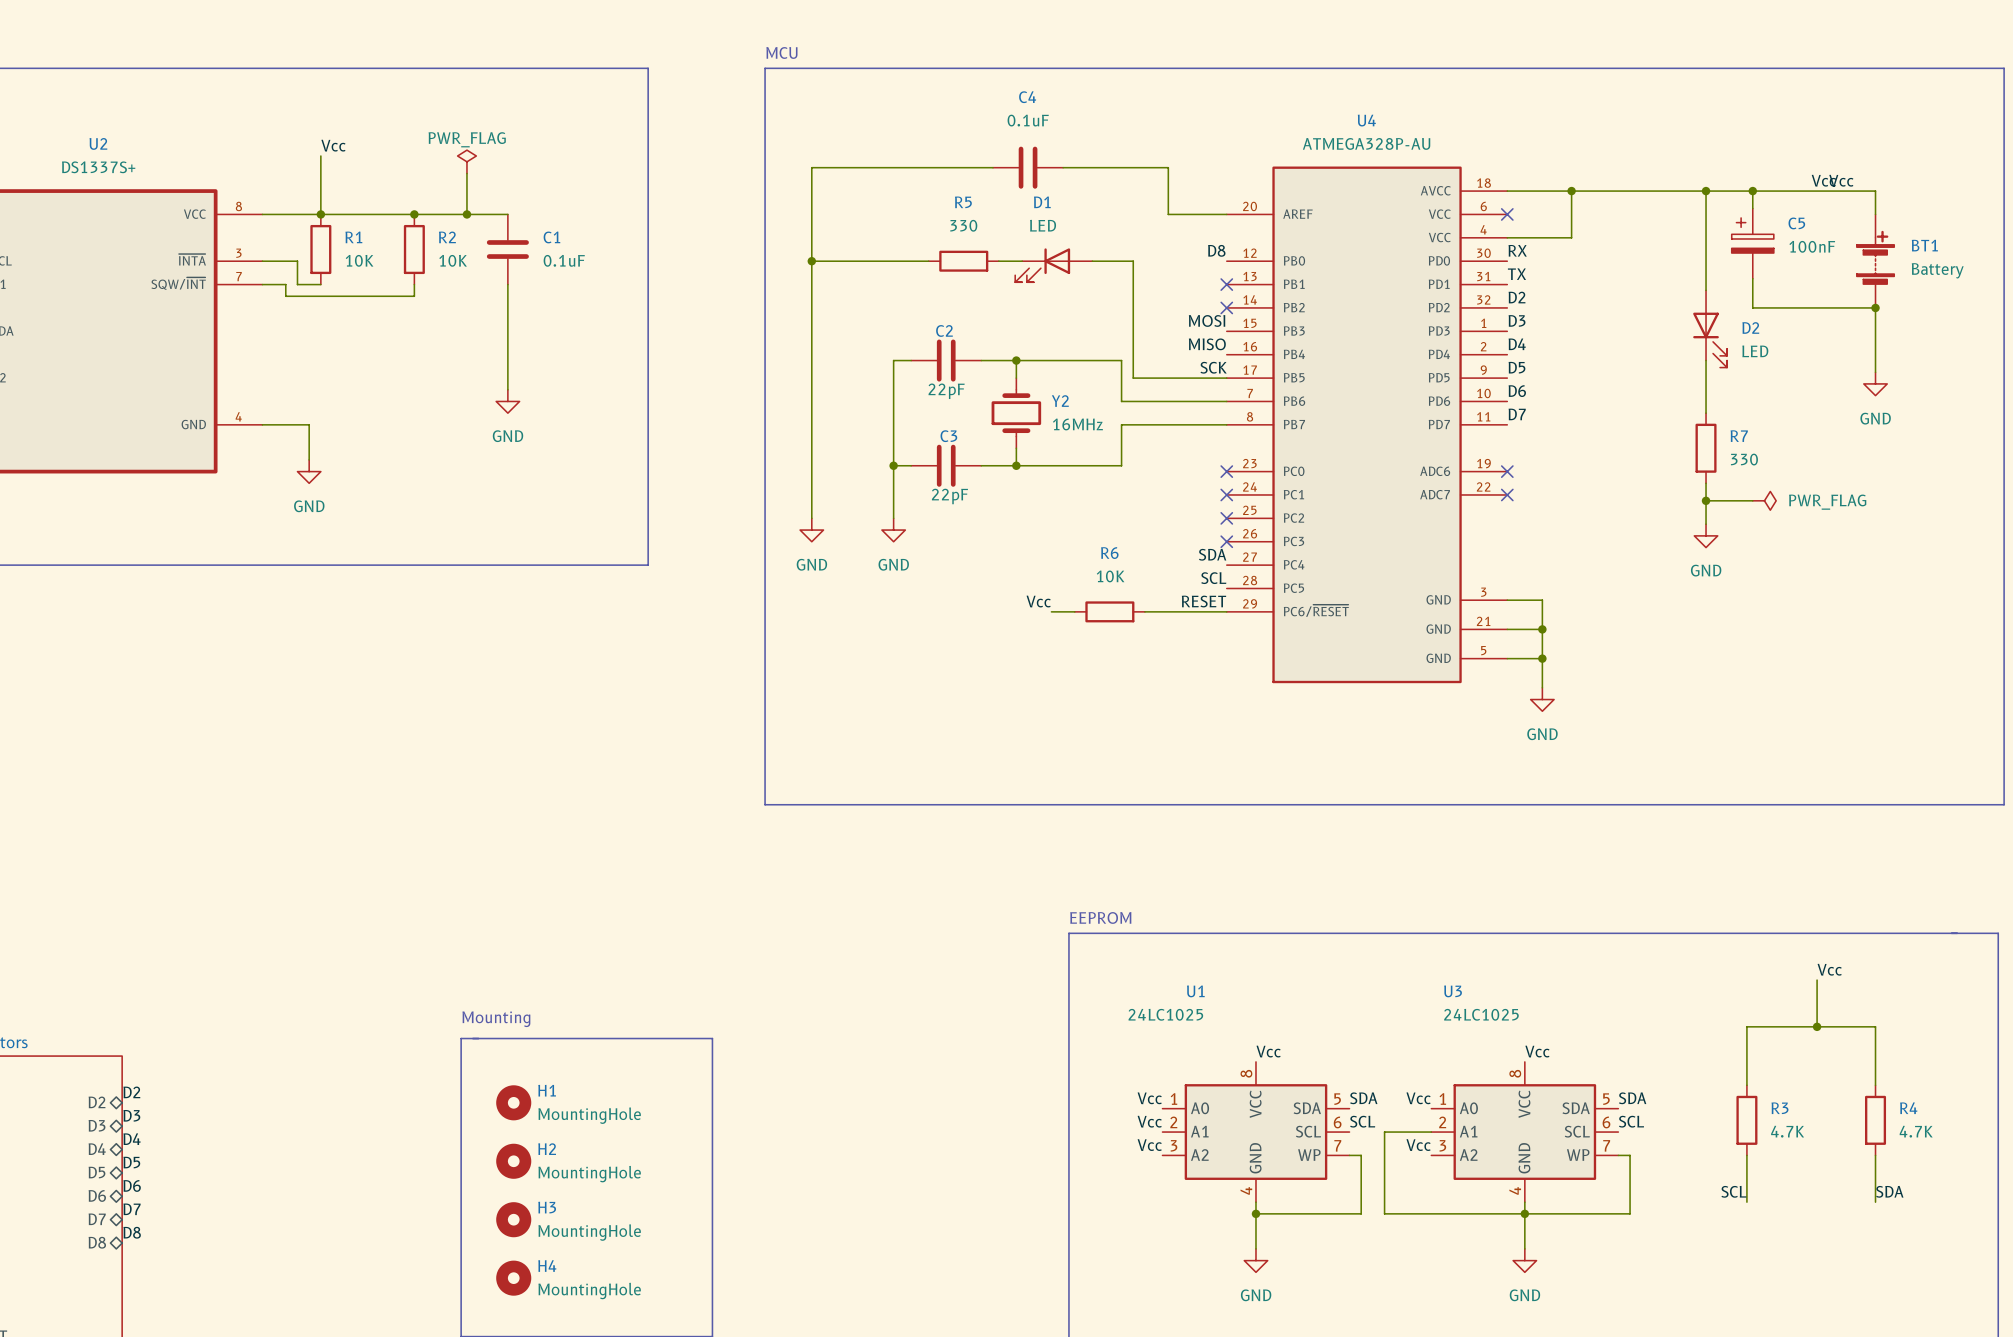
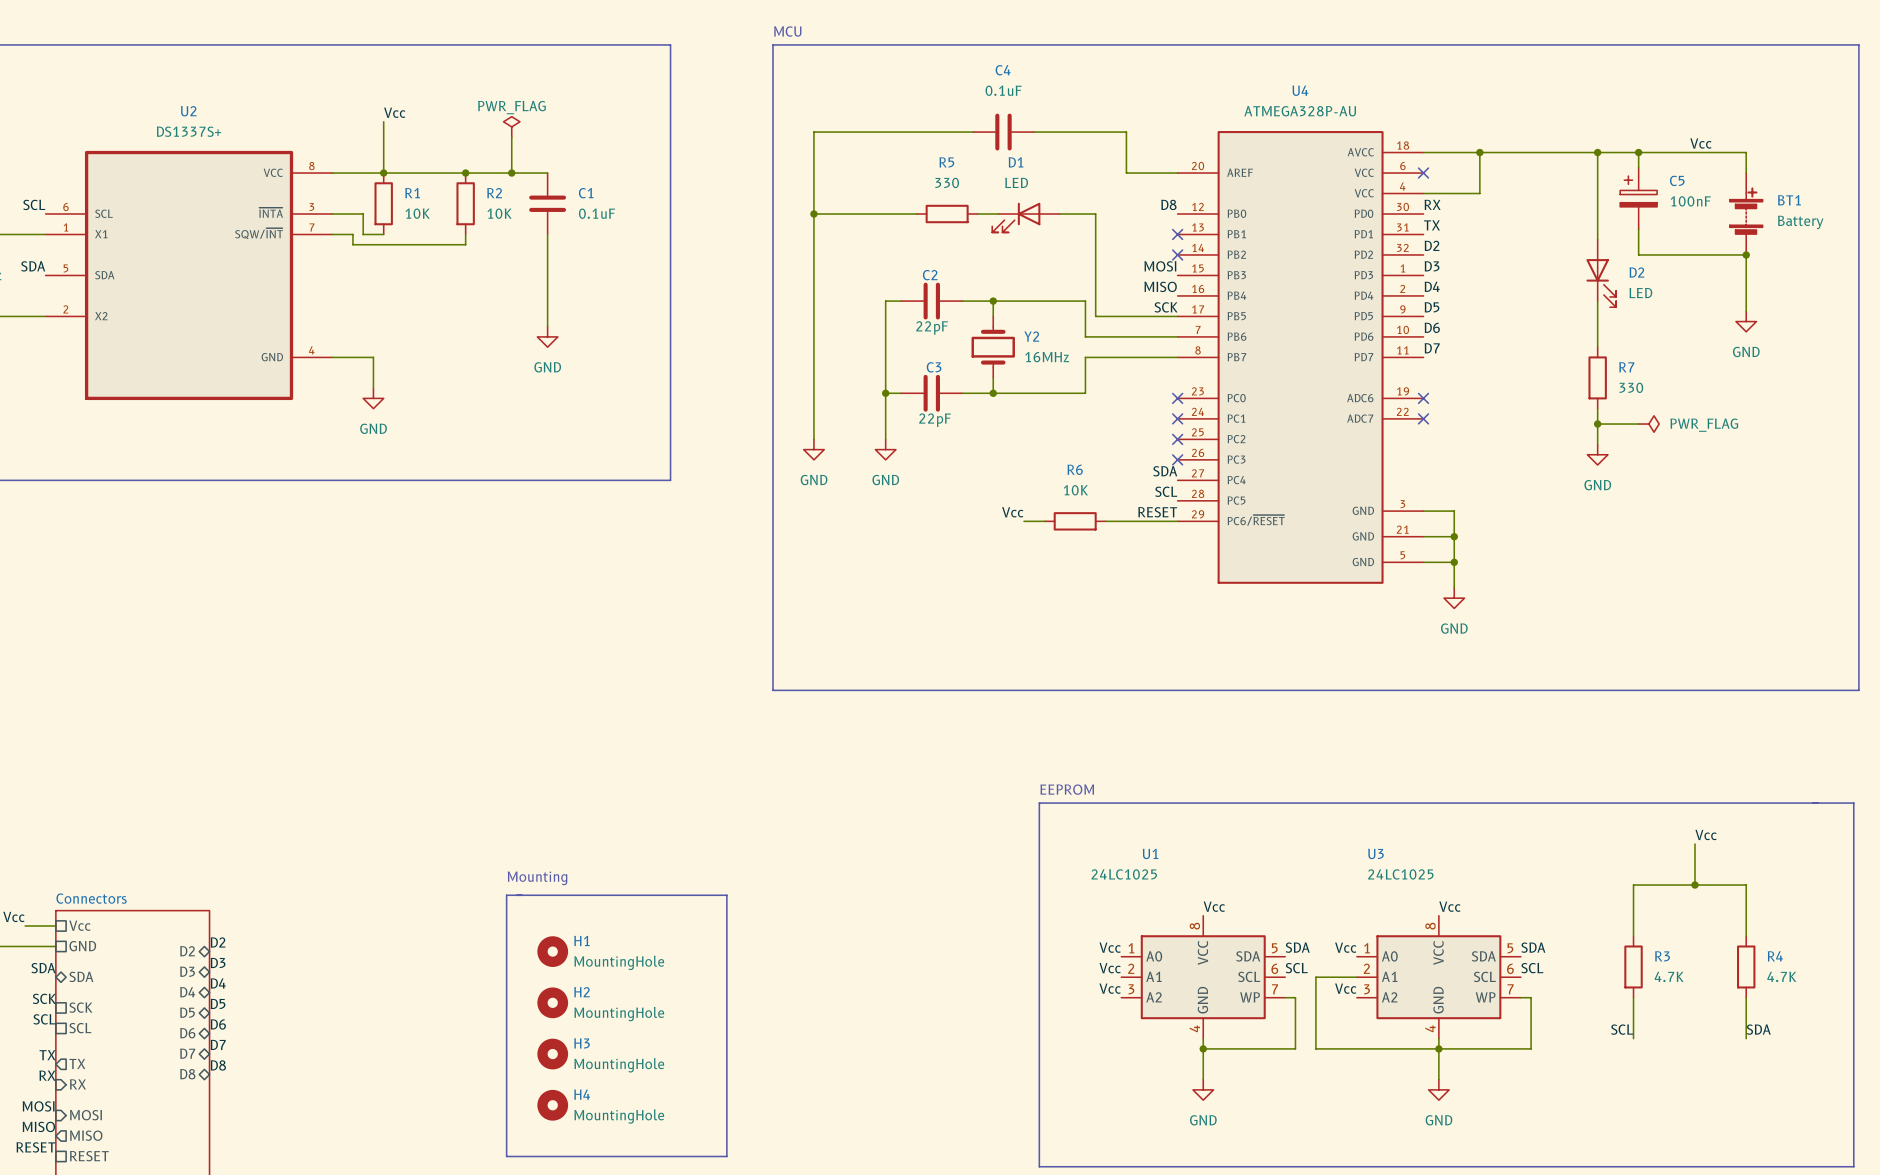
label: Vcc (1841, 180) -> none

